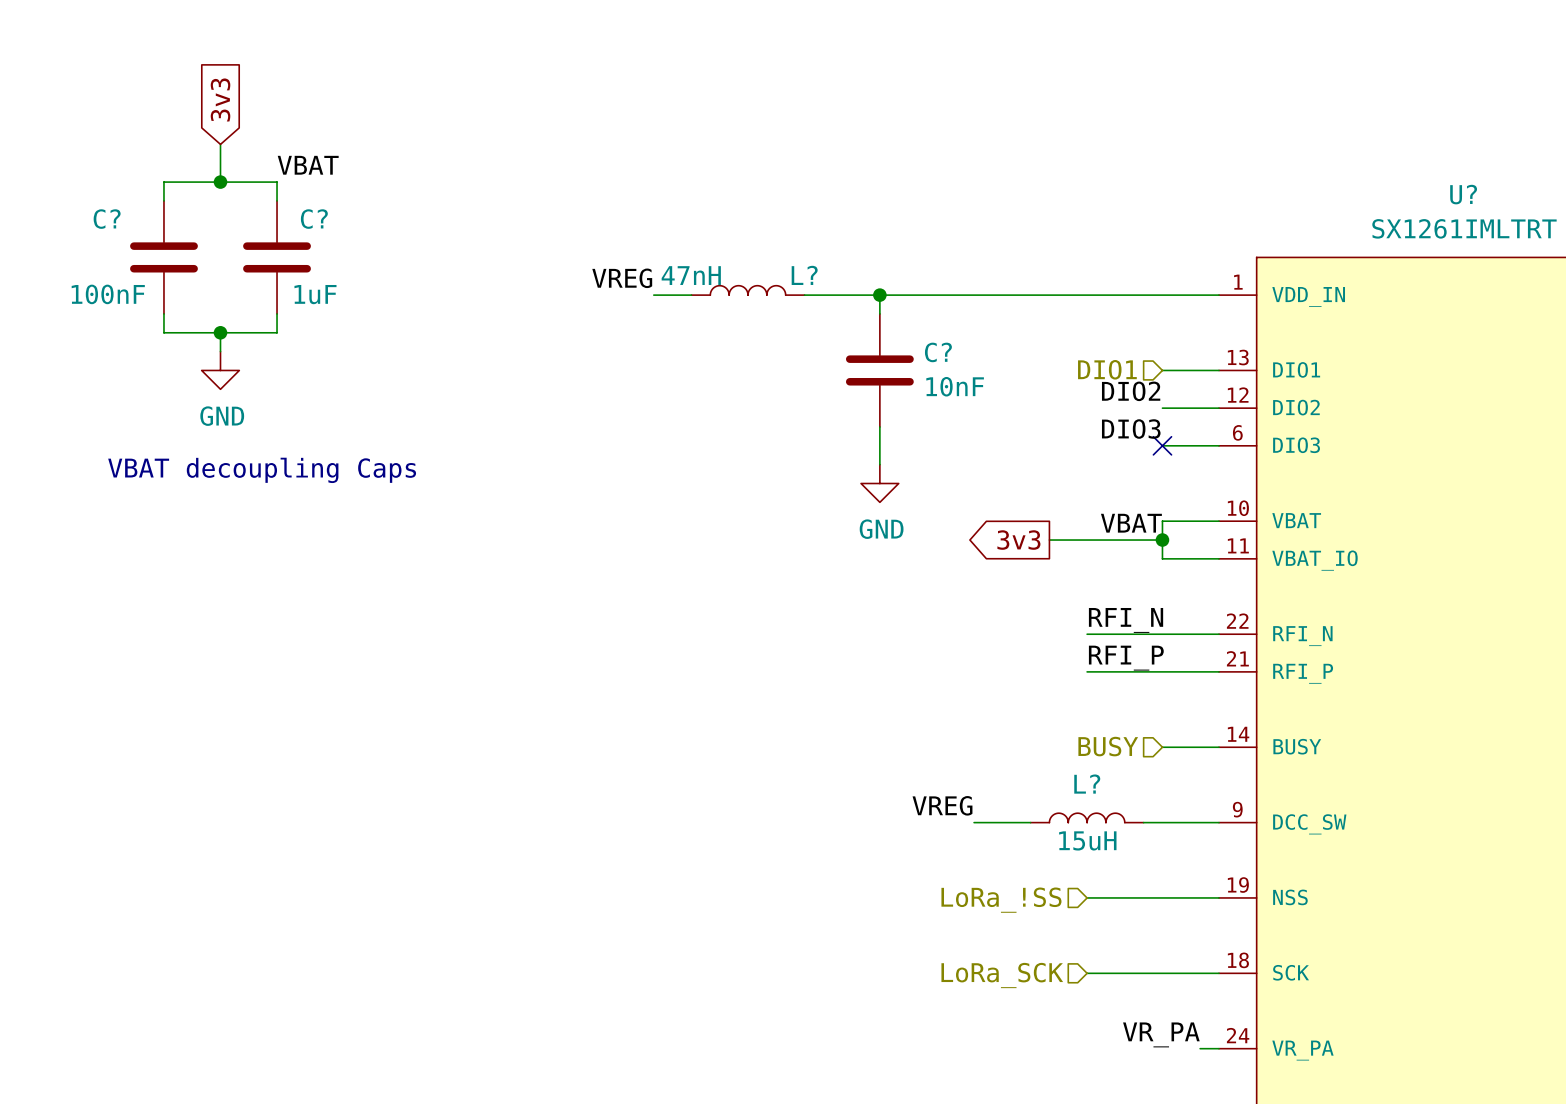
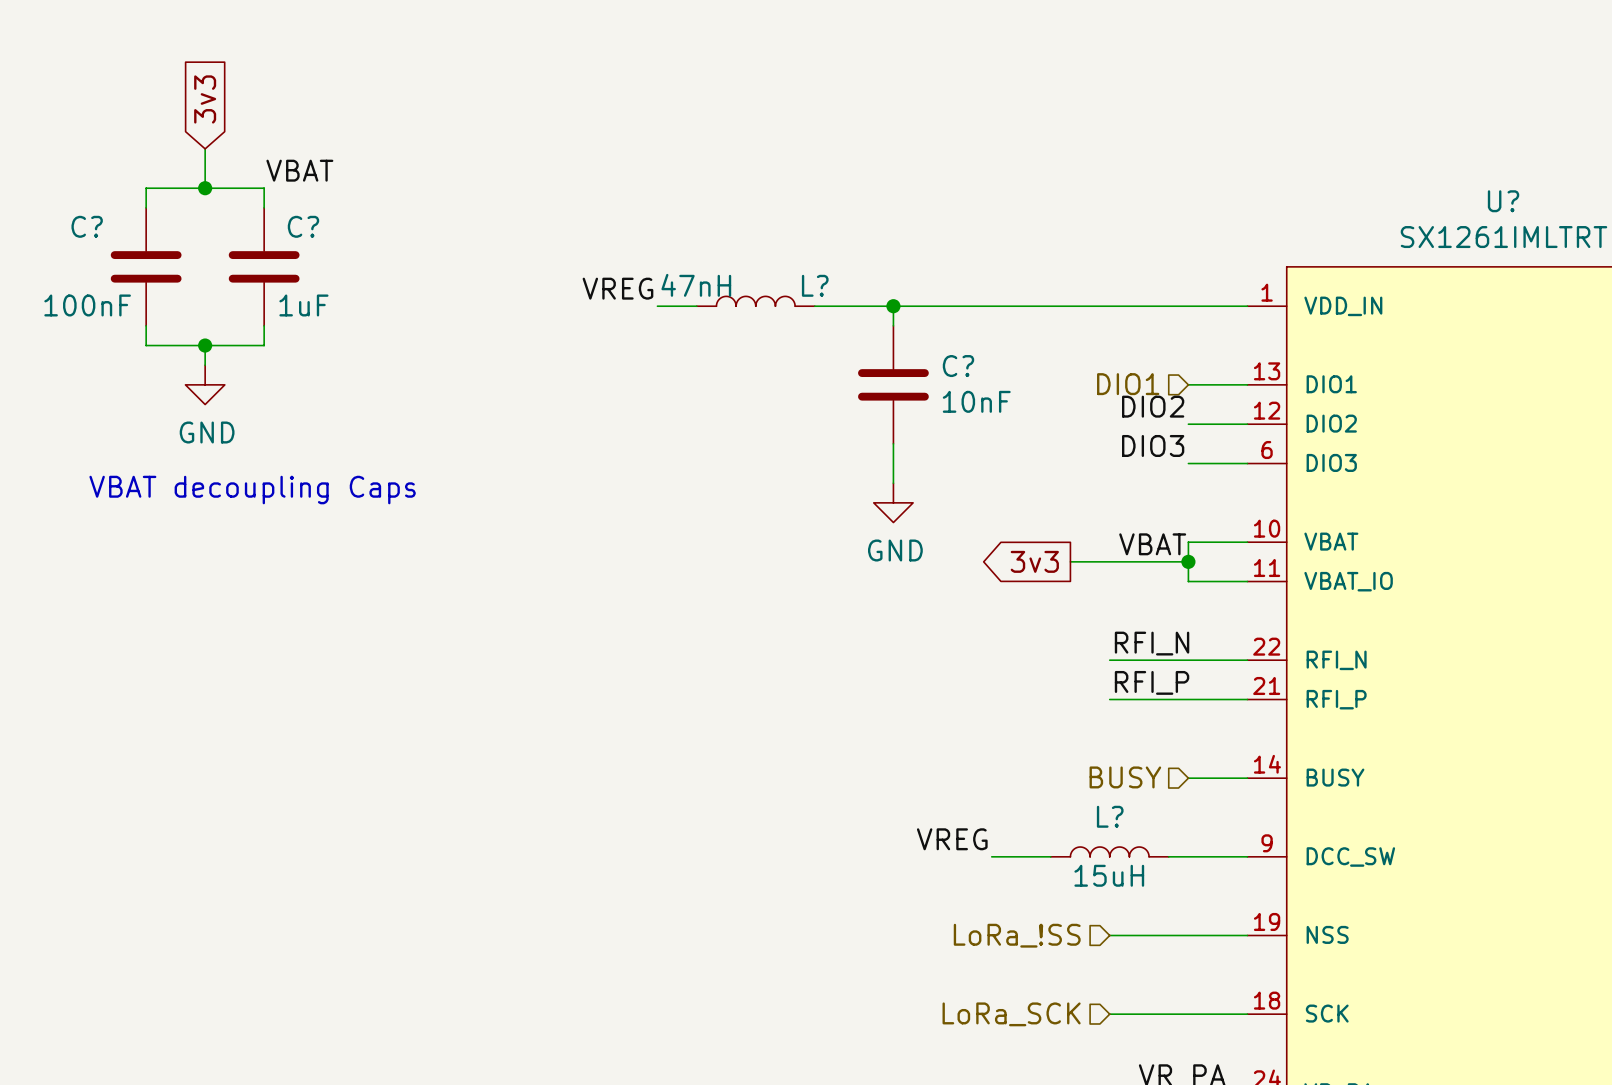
no-connect mark: (1162, 445) -> none

